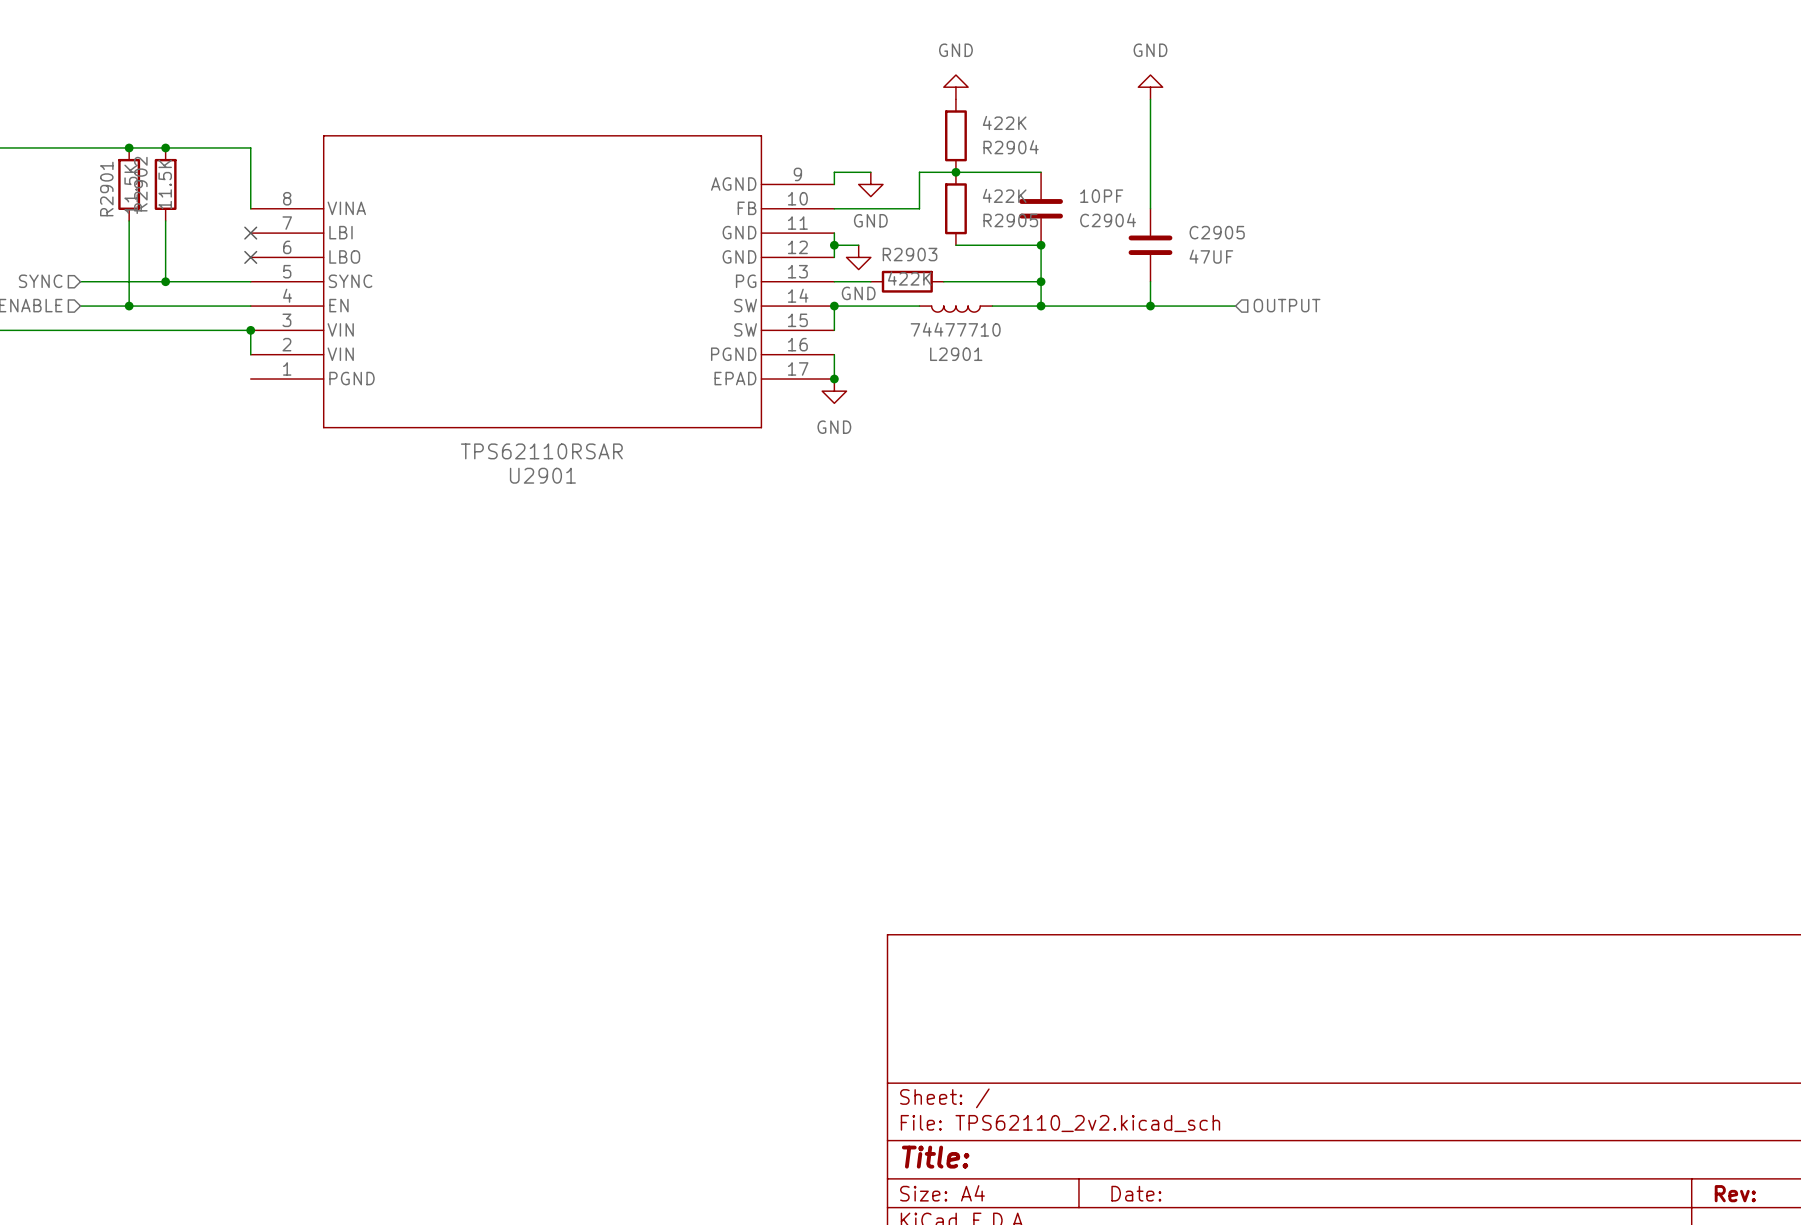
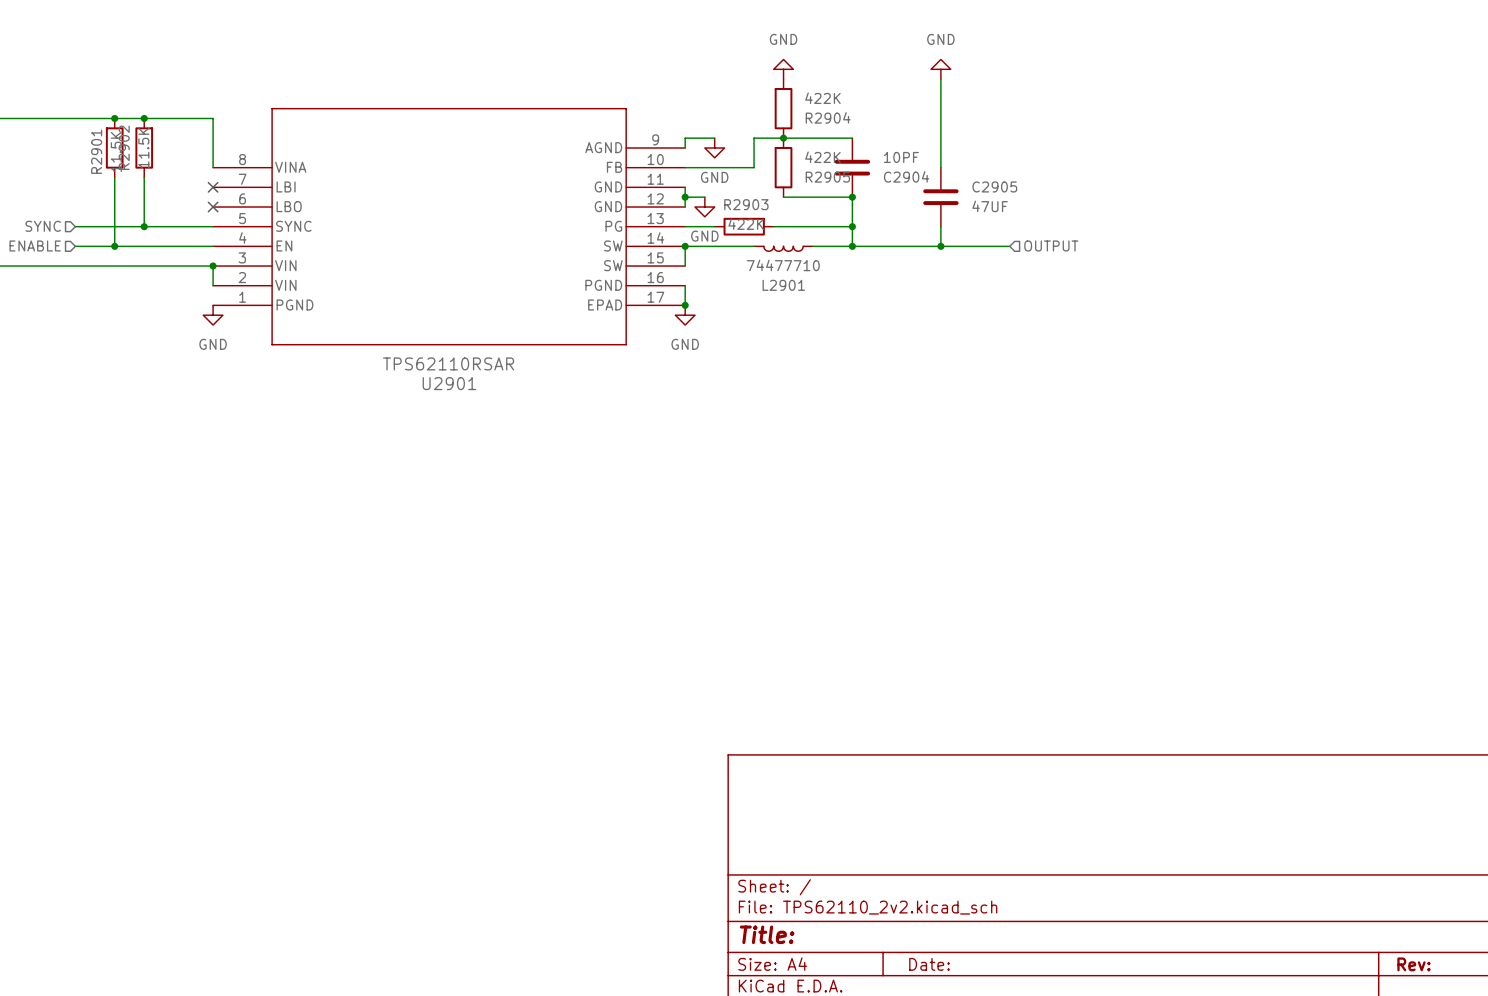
power symbol: none -> GND (213, 315)

